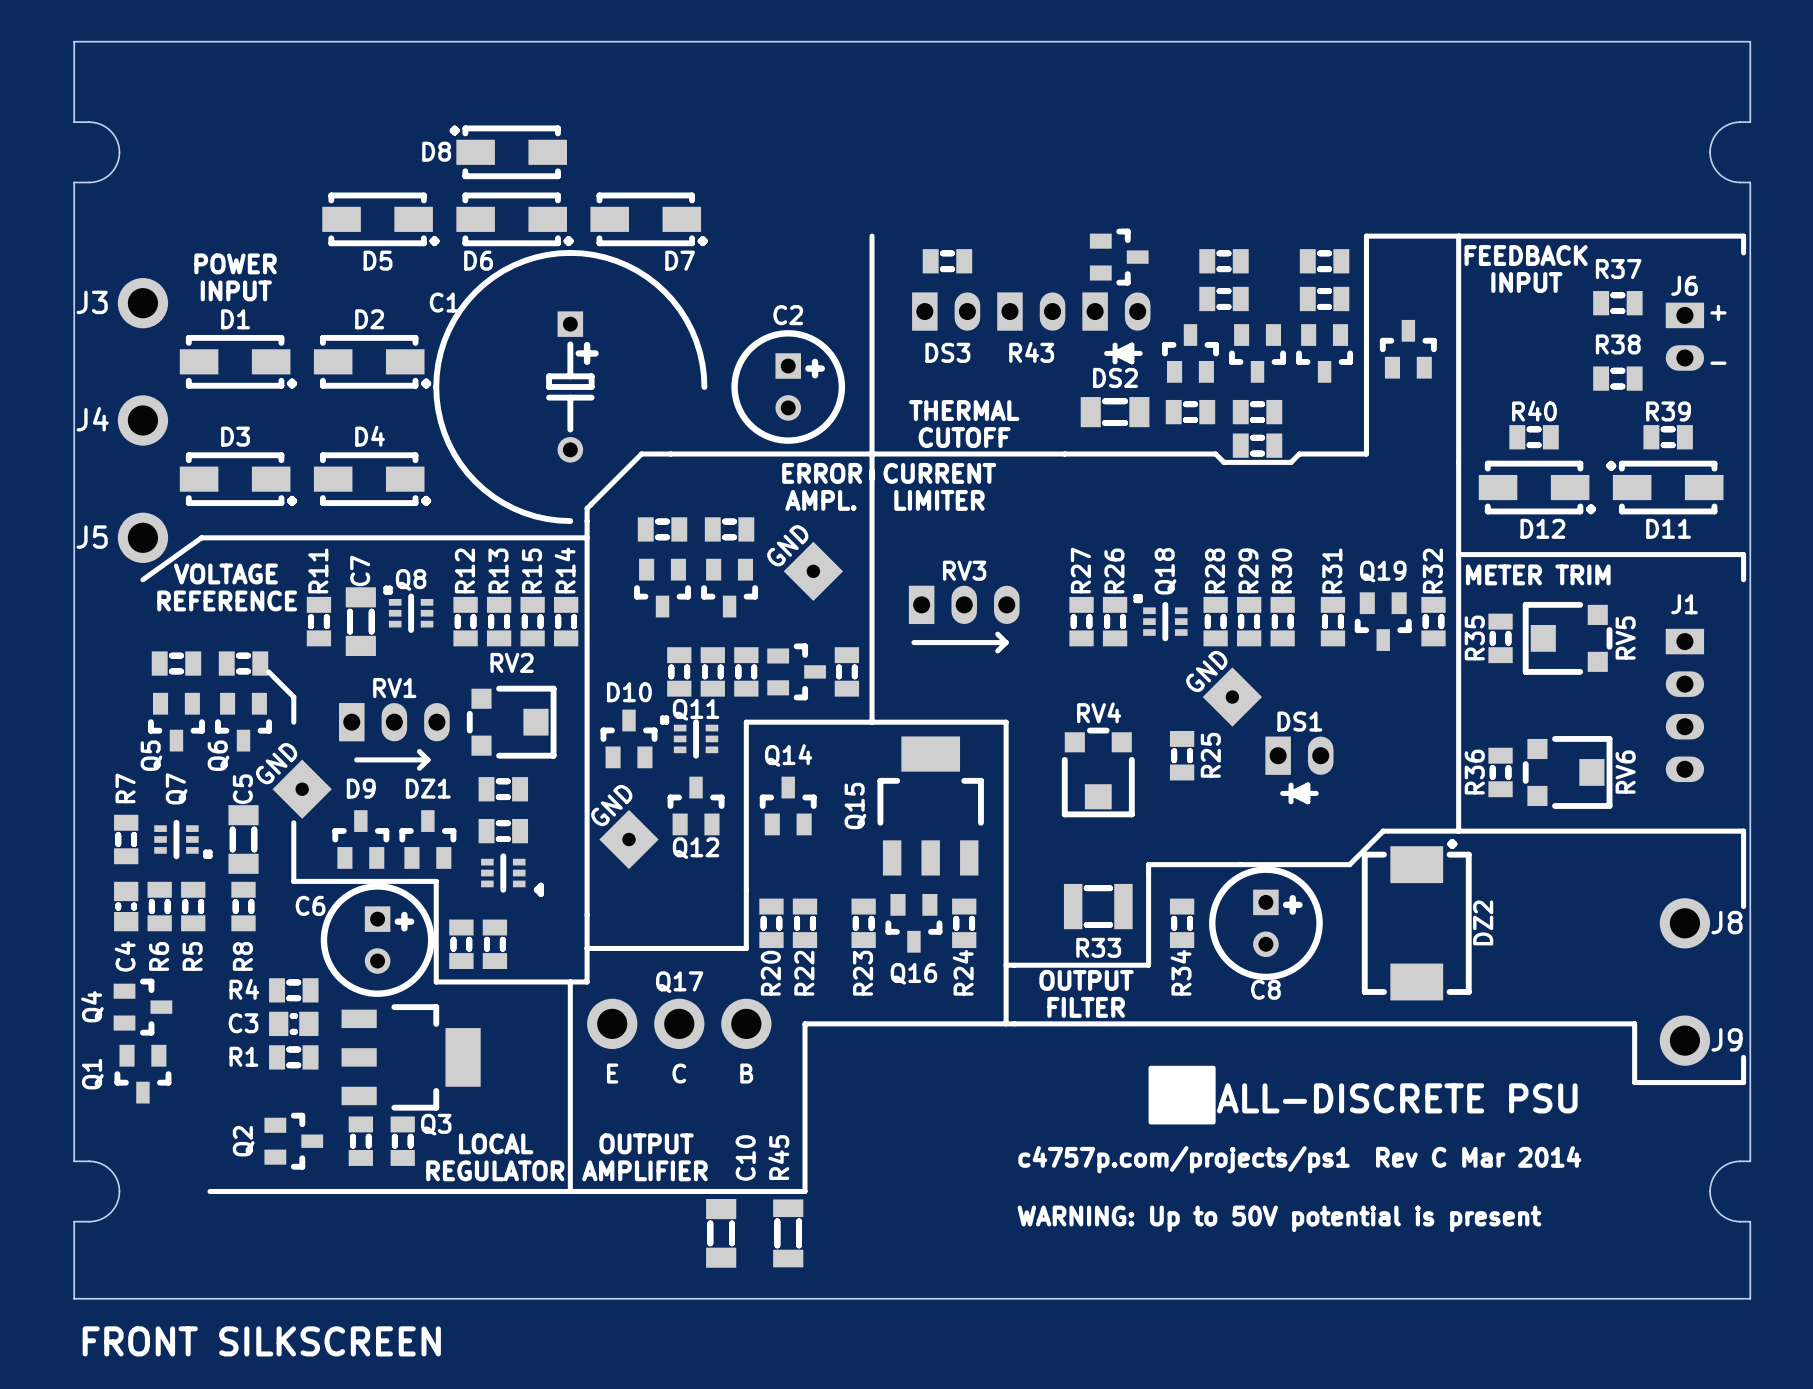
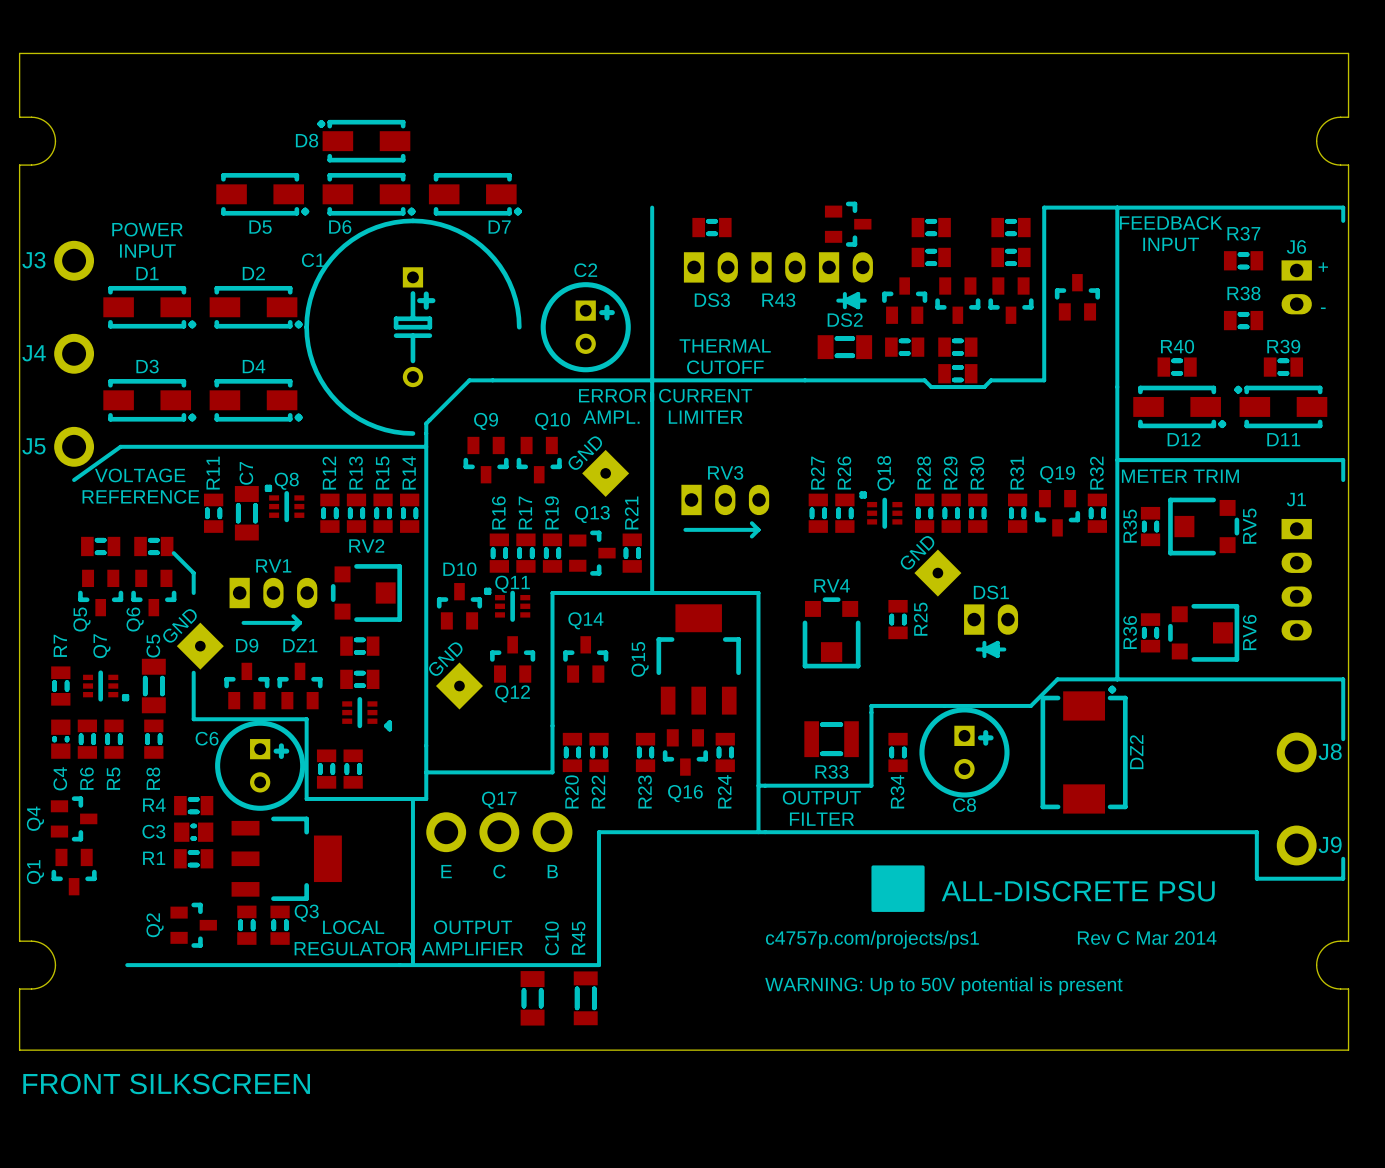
part: (662, 529) -> none
part: (729, 529) -> none
Q9: none -> (486, 460)
Q10: none -> (539, 460)
part: (662, 588) -> none
part: (729, 588) -> none
R17 name: none -> R17 (525, 512)
R16 name: none -> R16 (498, 512)
R19 name: none -> R19 (552, 512)
Q13 name: none -> Q13 (592, 514)
R21 name: none -> R21 (631, 512)

